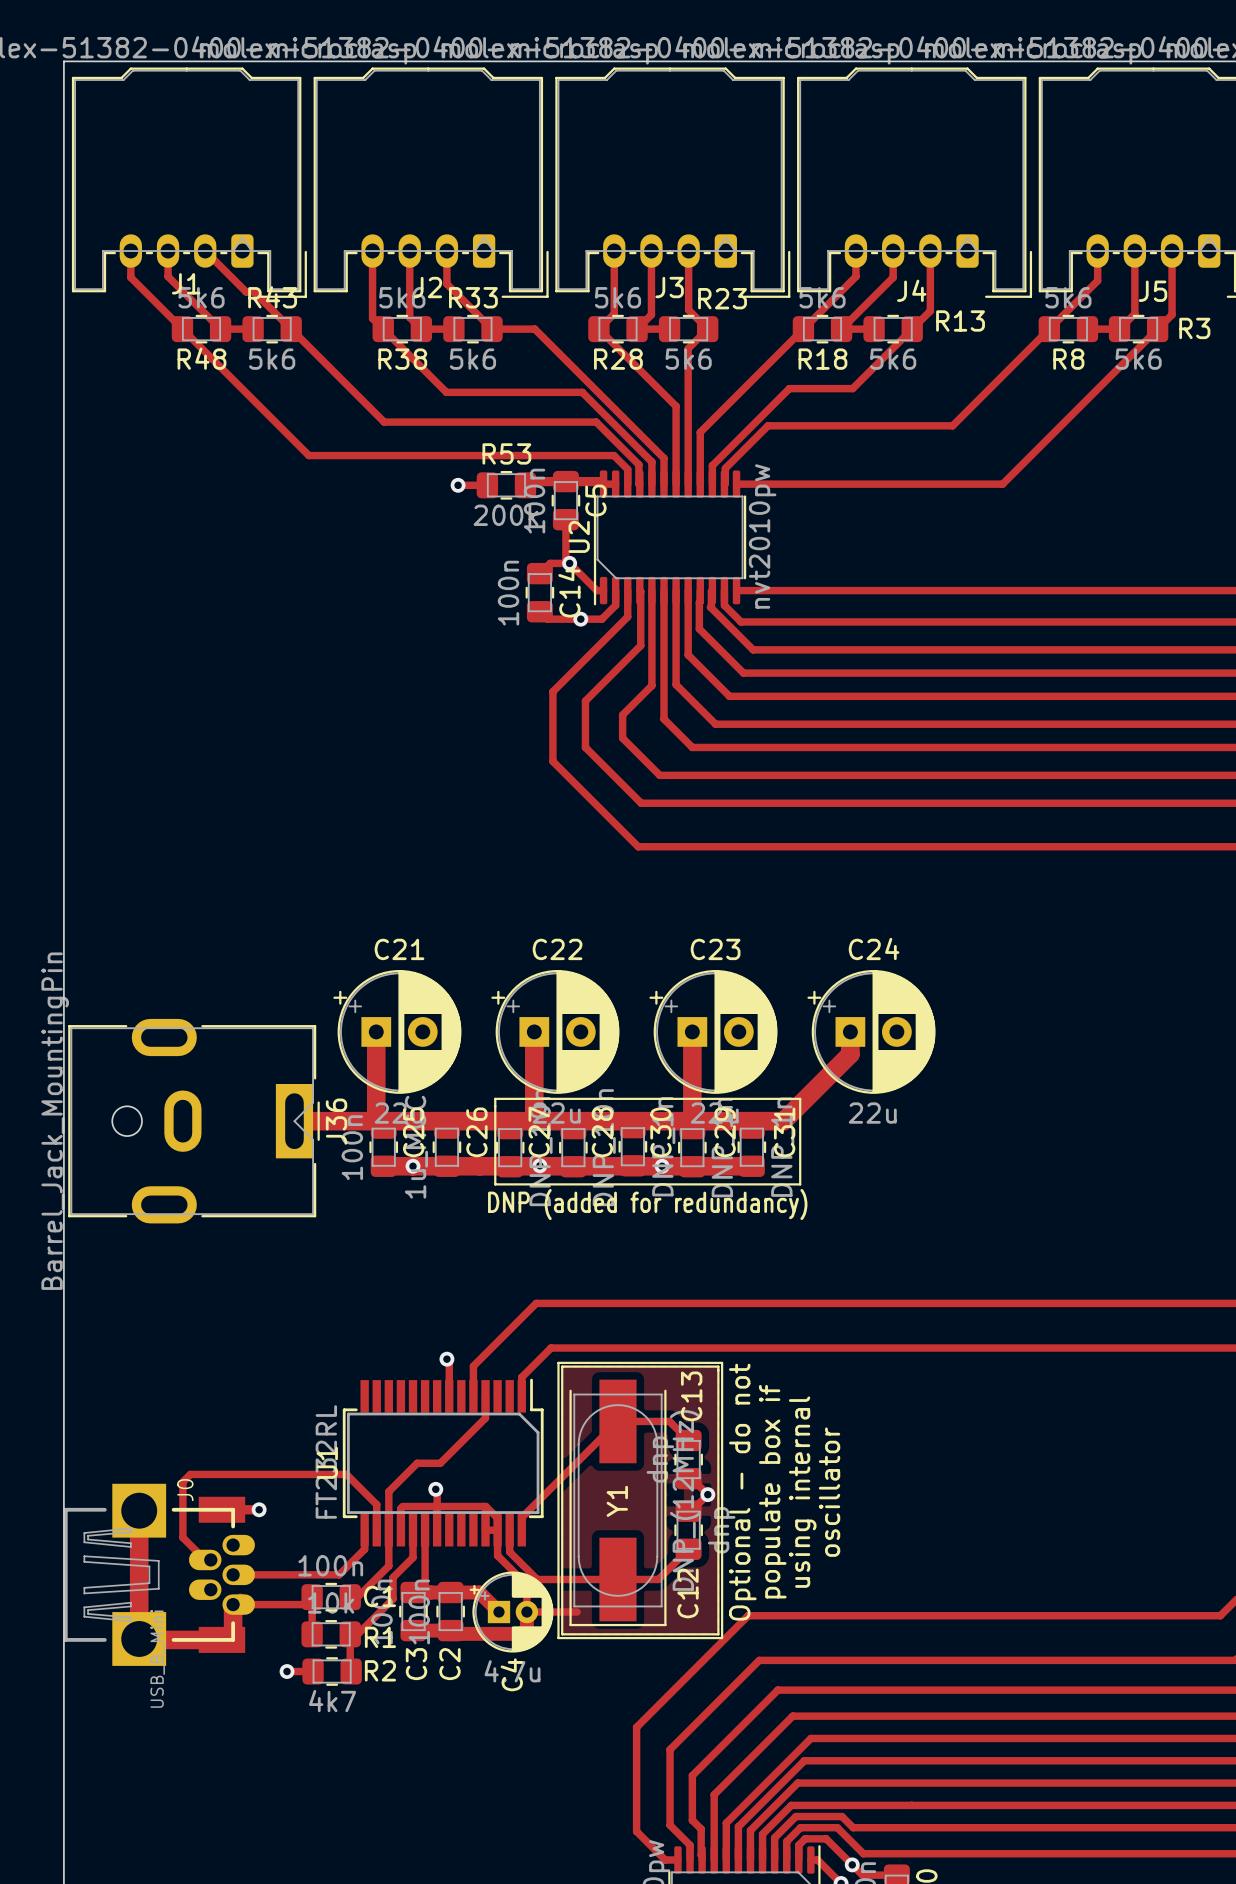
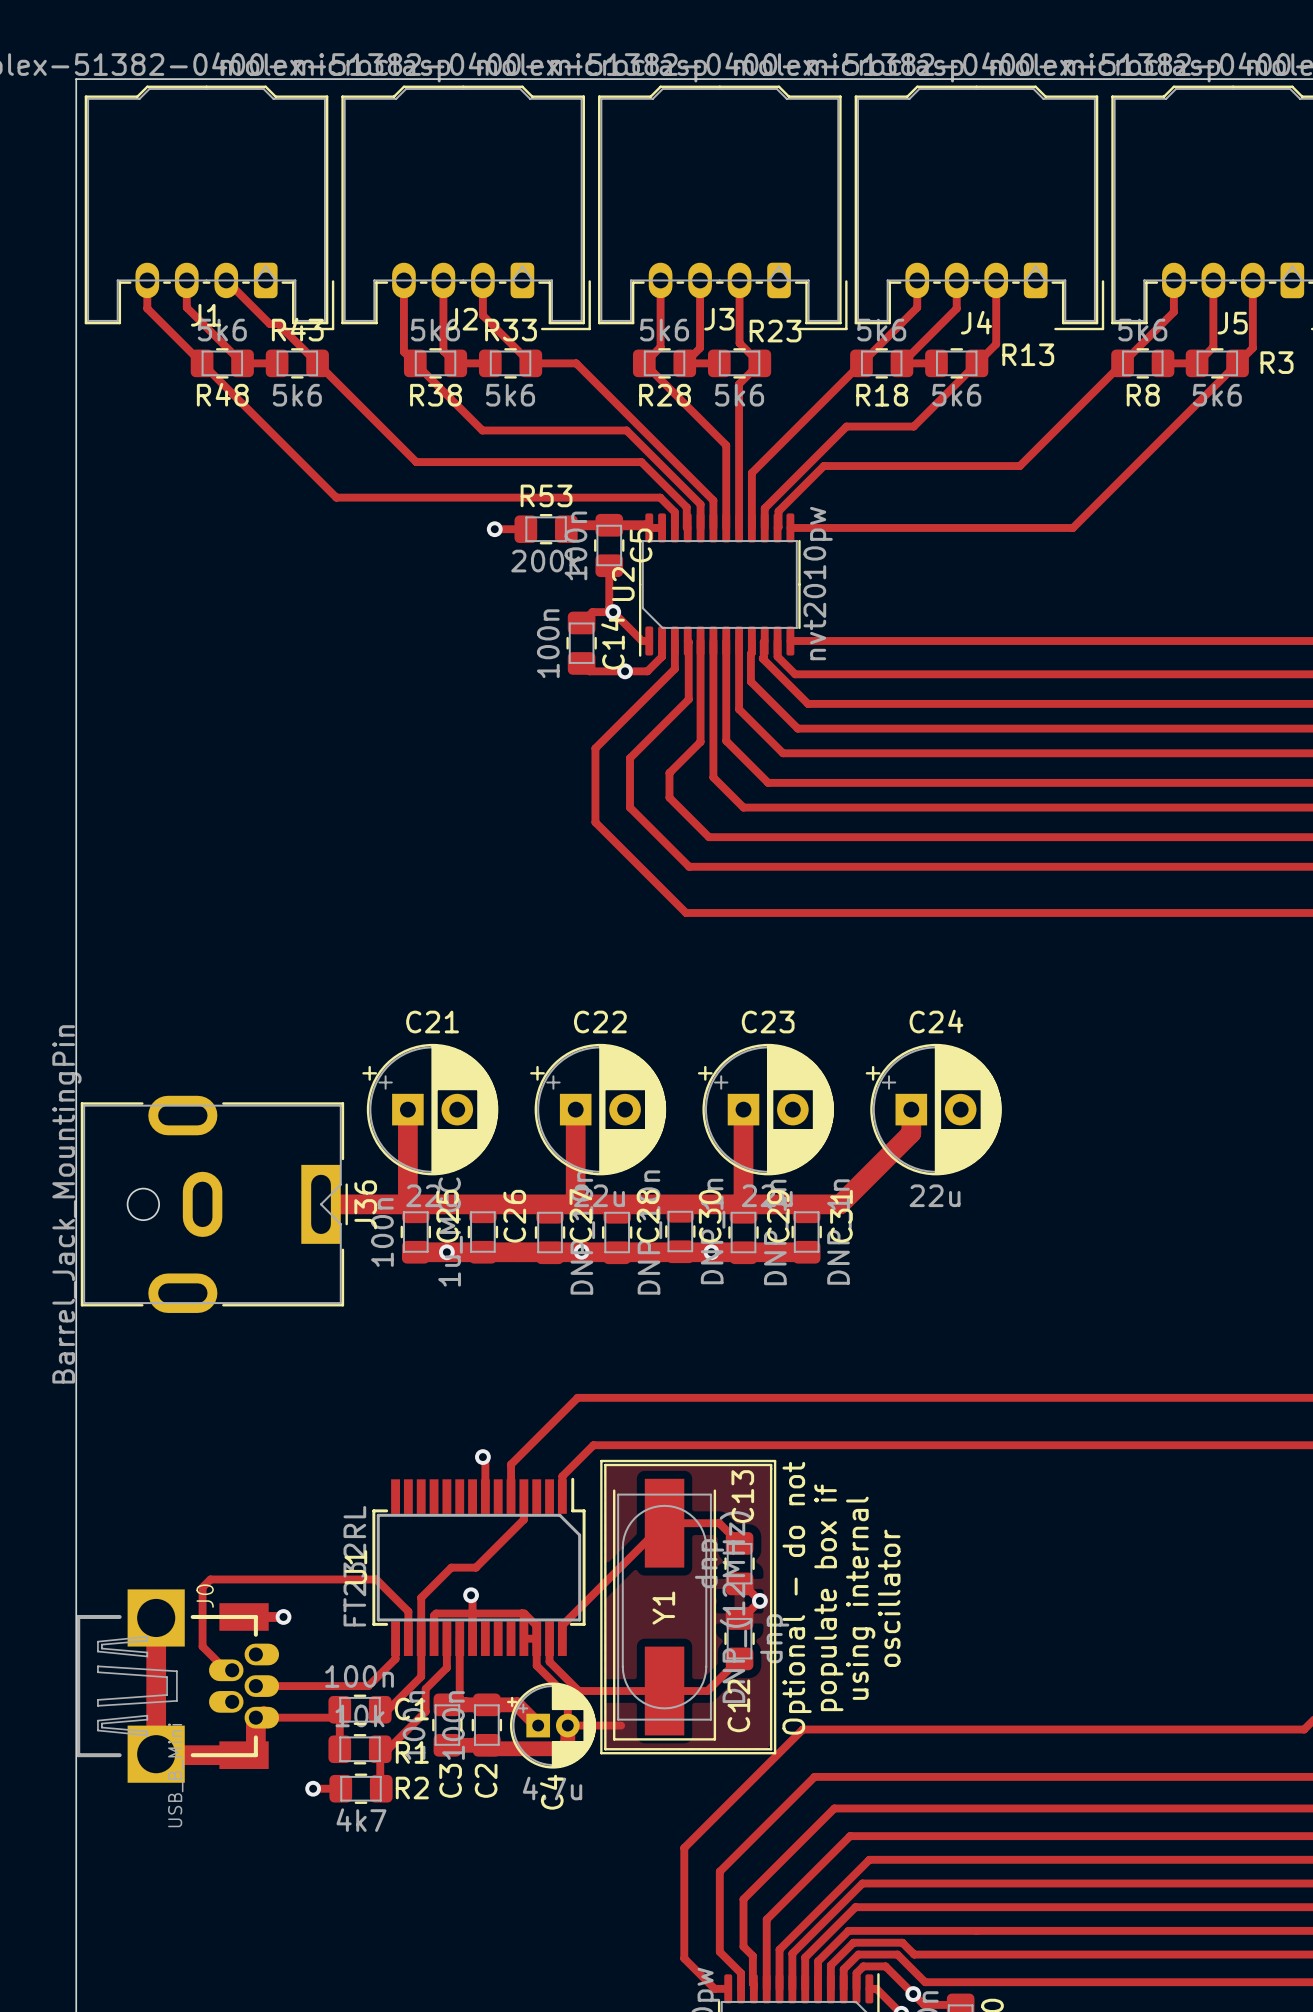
line: (495, 1098) (495, 1184) (800, 1184) (800, 1098) (495, 1098) -> none
text: DNP (added for redundancy) (647, 1204) -> none

